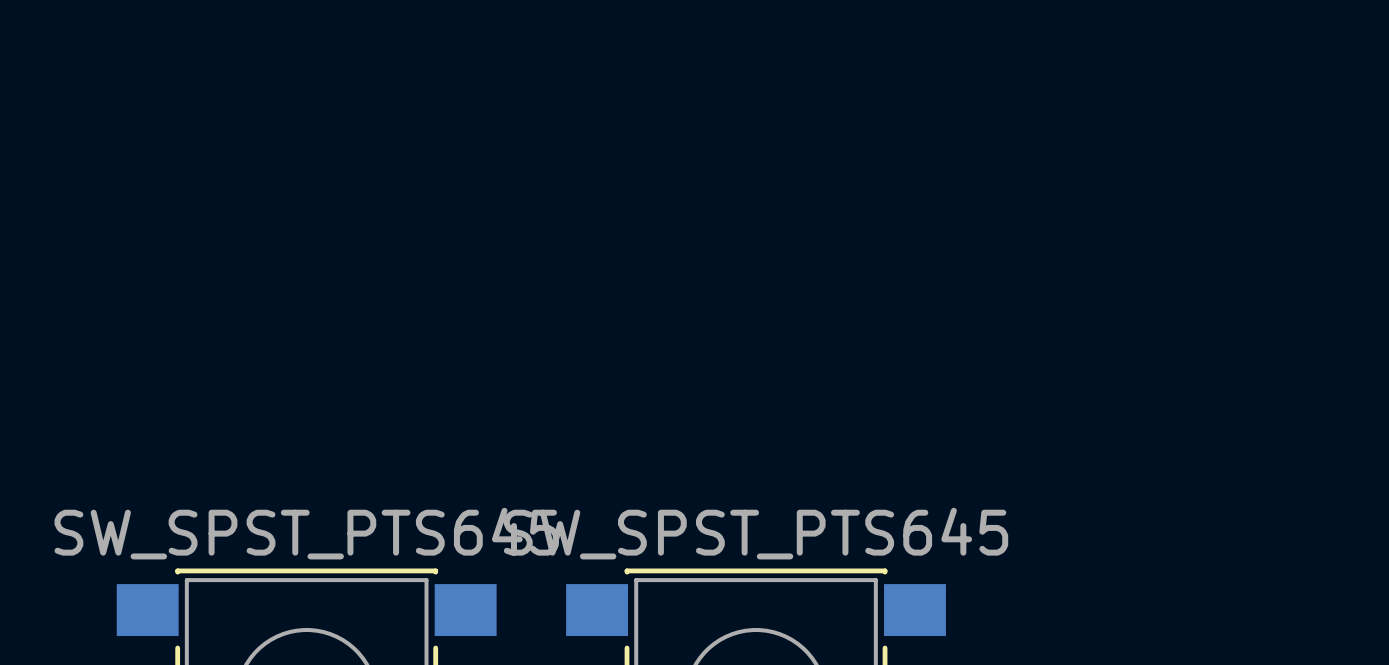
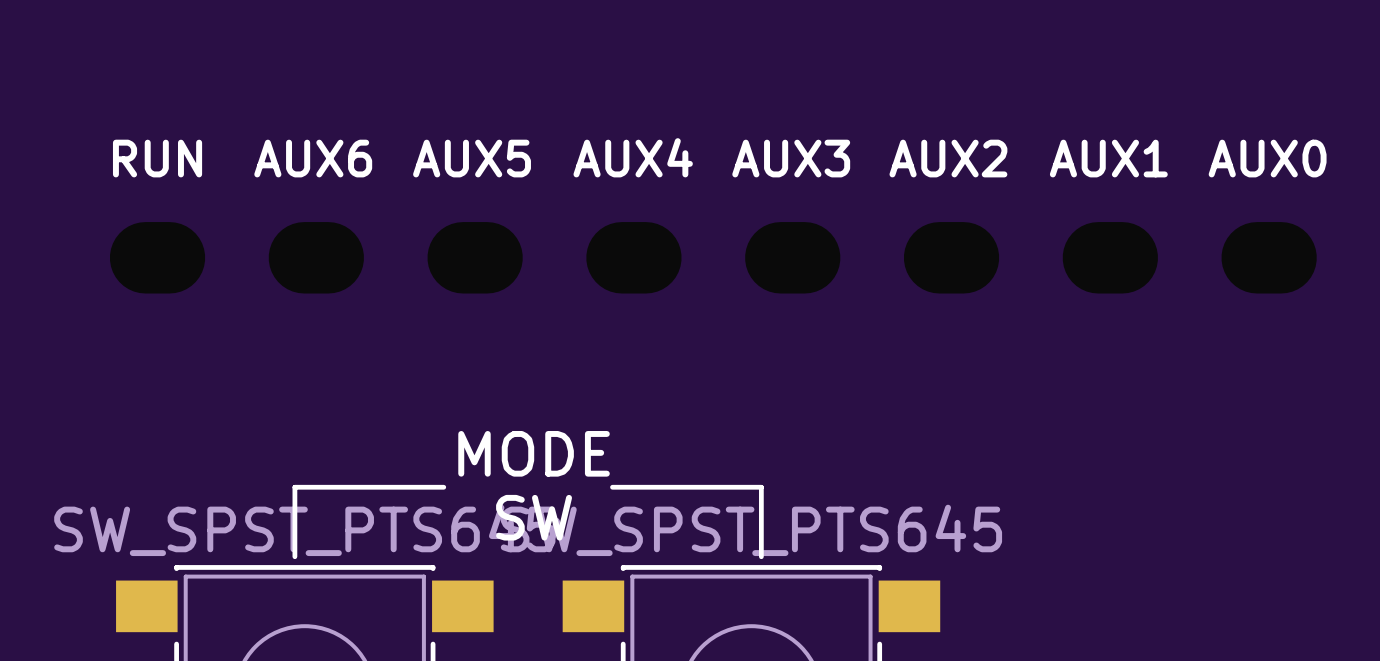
part text: none -> AUX4 (633, 157)
part text: none -> RUN (157, 158)
part text: none -> AUX6 (313, 158)
part text: none -> AUX5 (472, 158)
part text: none -> AUX3 (791, 158)
part text: none -> AUX2 (948, 158)
part text: none -> AUX1 (1108, 158)
part text: none -> AUX0 (1267, 158)
text: none -> MODE (534, 453)
line: none -> (443, 487) (294, 487) (294, 556)
line: none -> (612, 487) (761, 487) (761, 556)
text: none -> SW (534, 517)

